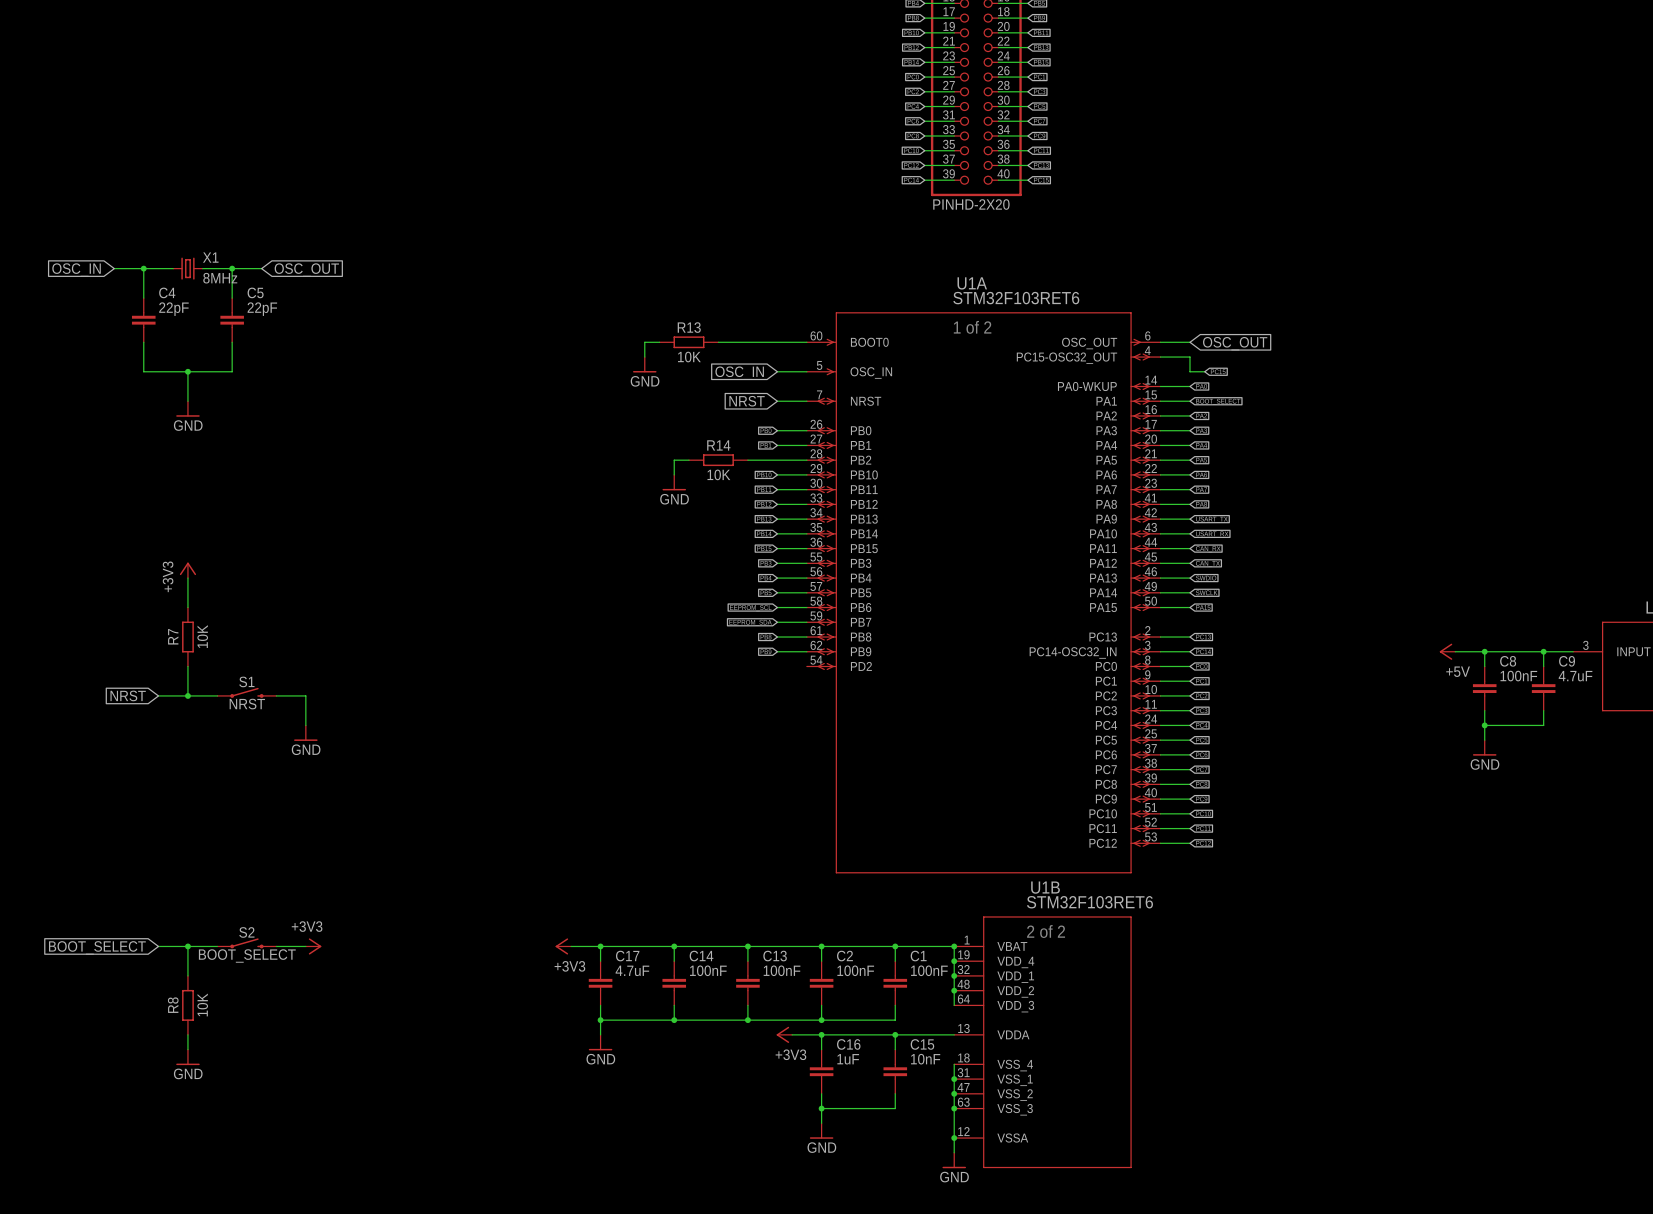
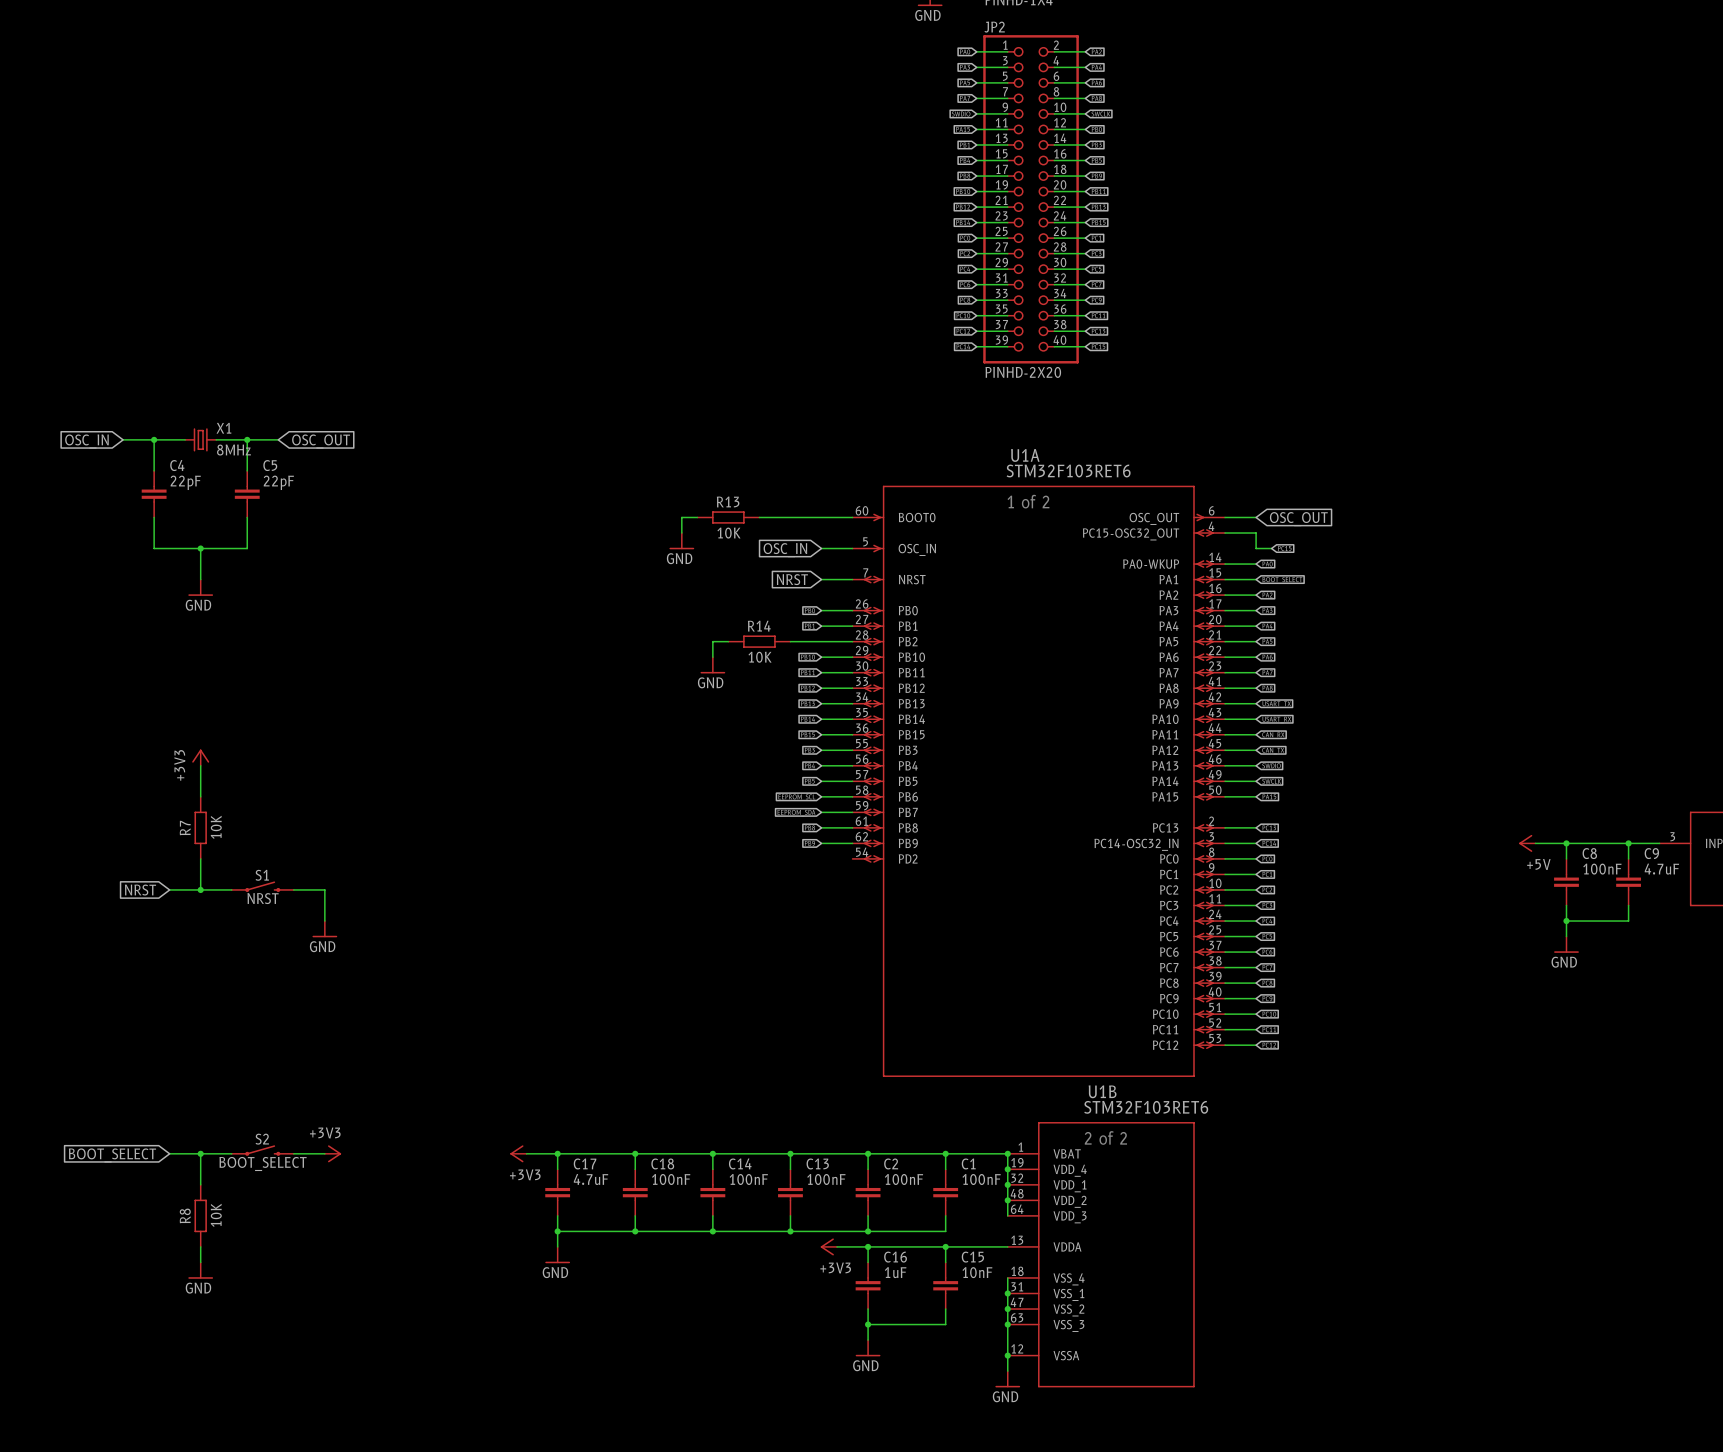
wire: none -> (526, 1153) (604, 1153)
wire: none -> (557, 1153) (557, 1169)
junction: none -> (557, 1153)
power symbol position: +3V3 (563, 946) -> +3V3 (518, 1153)
C17 name: C17 (627, 956) -> C18 (662, 1163)
C17 value: 4.7uF (632, 970) -> 100nF (671, 1179)
C17: none -> 4.7uF (557, 1192)
wire: none -> (557, 1215) (557, 1246)
junction: none -> (557, 1231)
wire: (600, 1020) (600, 1034) -> (635, 1231) (557, 1231)
power symbol position: GND (600, 1042) -> GND (557, 1255)

